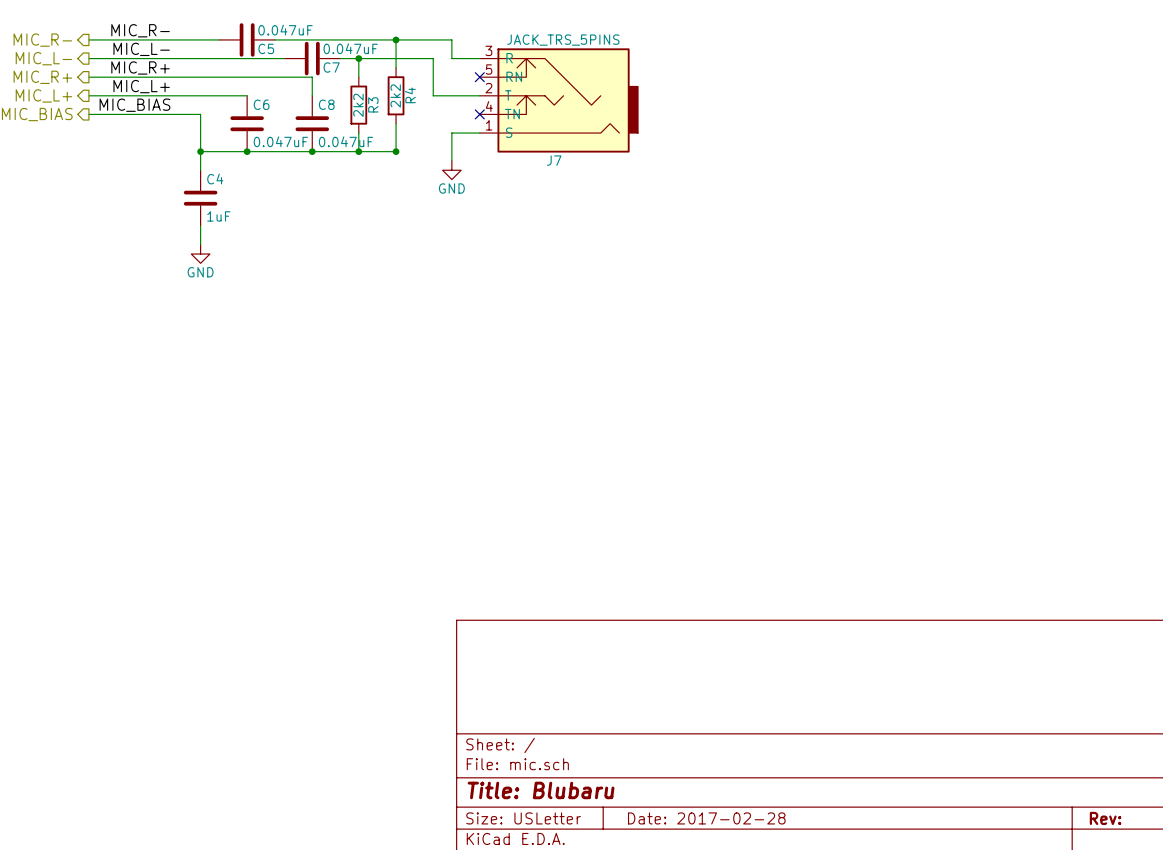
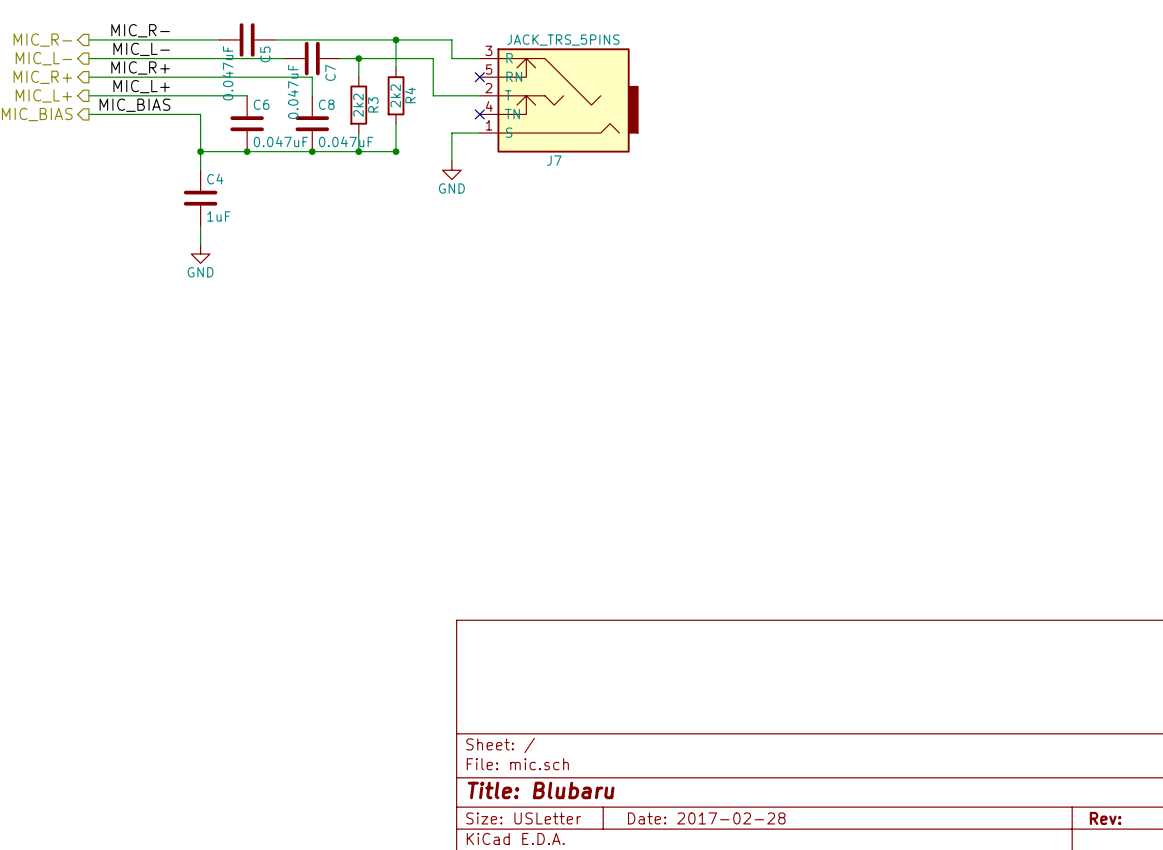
C5 value rotation: 0° (285, 30) -> 90° counterclockwise (227, 73)
C5 value position: 0.047uF (285, 30) -> 0.047uF (227, 73)
C5 name rotation: 0° (266, 48) -> 90° counterclockwise (265, 54)
C7 value rotation: 0° (350, 48) -> 90° counterclockwise (293, 91)
C7 value position: 0.047uF (350, 48) -> 0.047uF (293, 91)
C7 name rotation: 0° (331, 67) -> 90° counterclockwise (330, 72)

